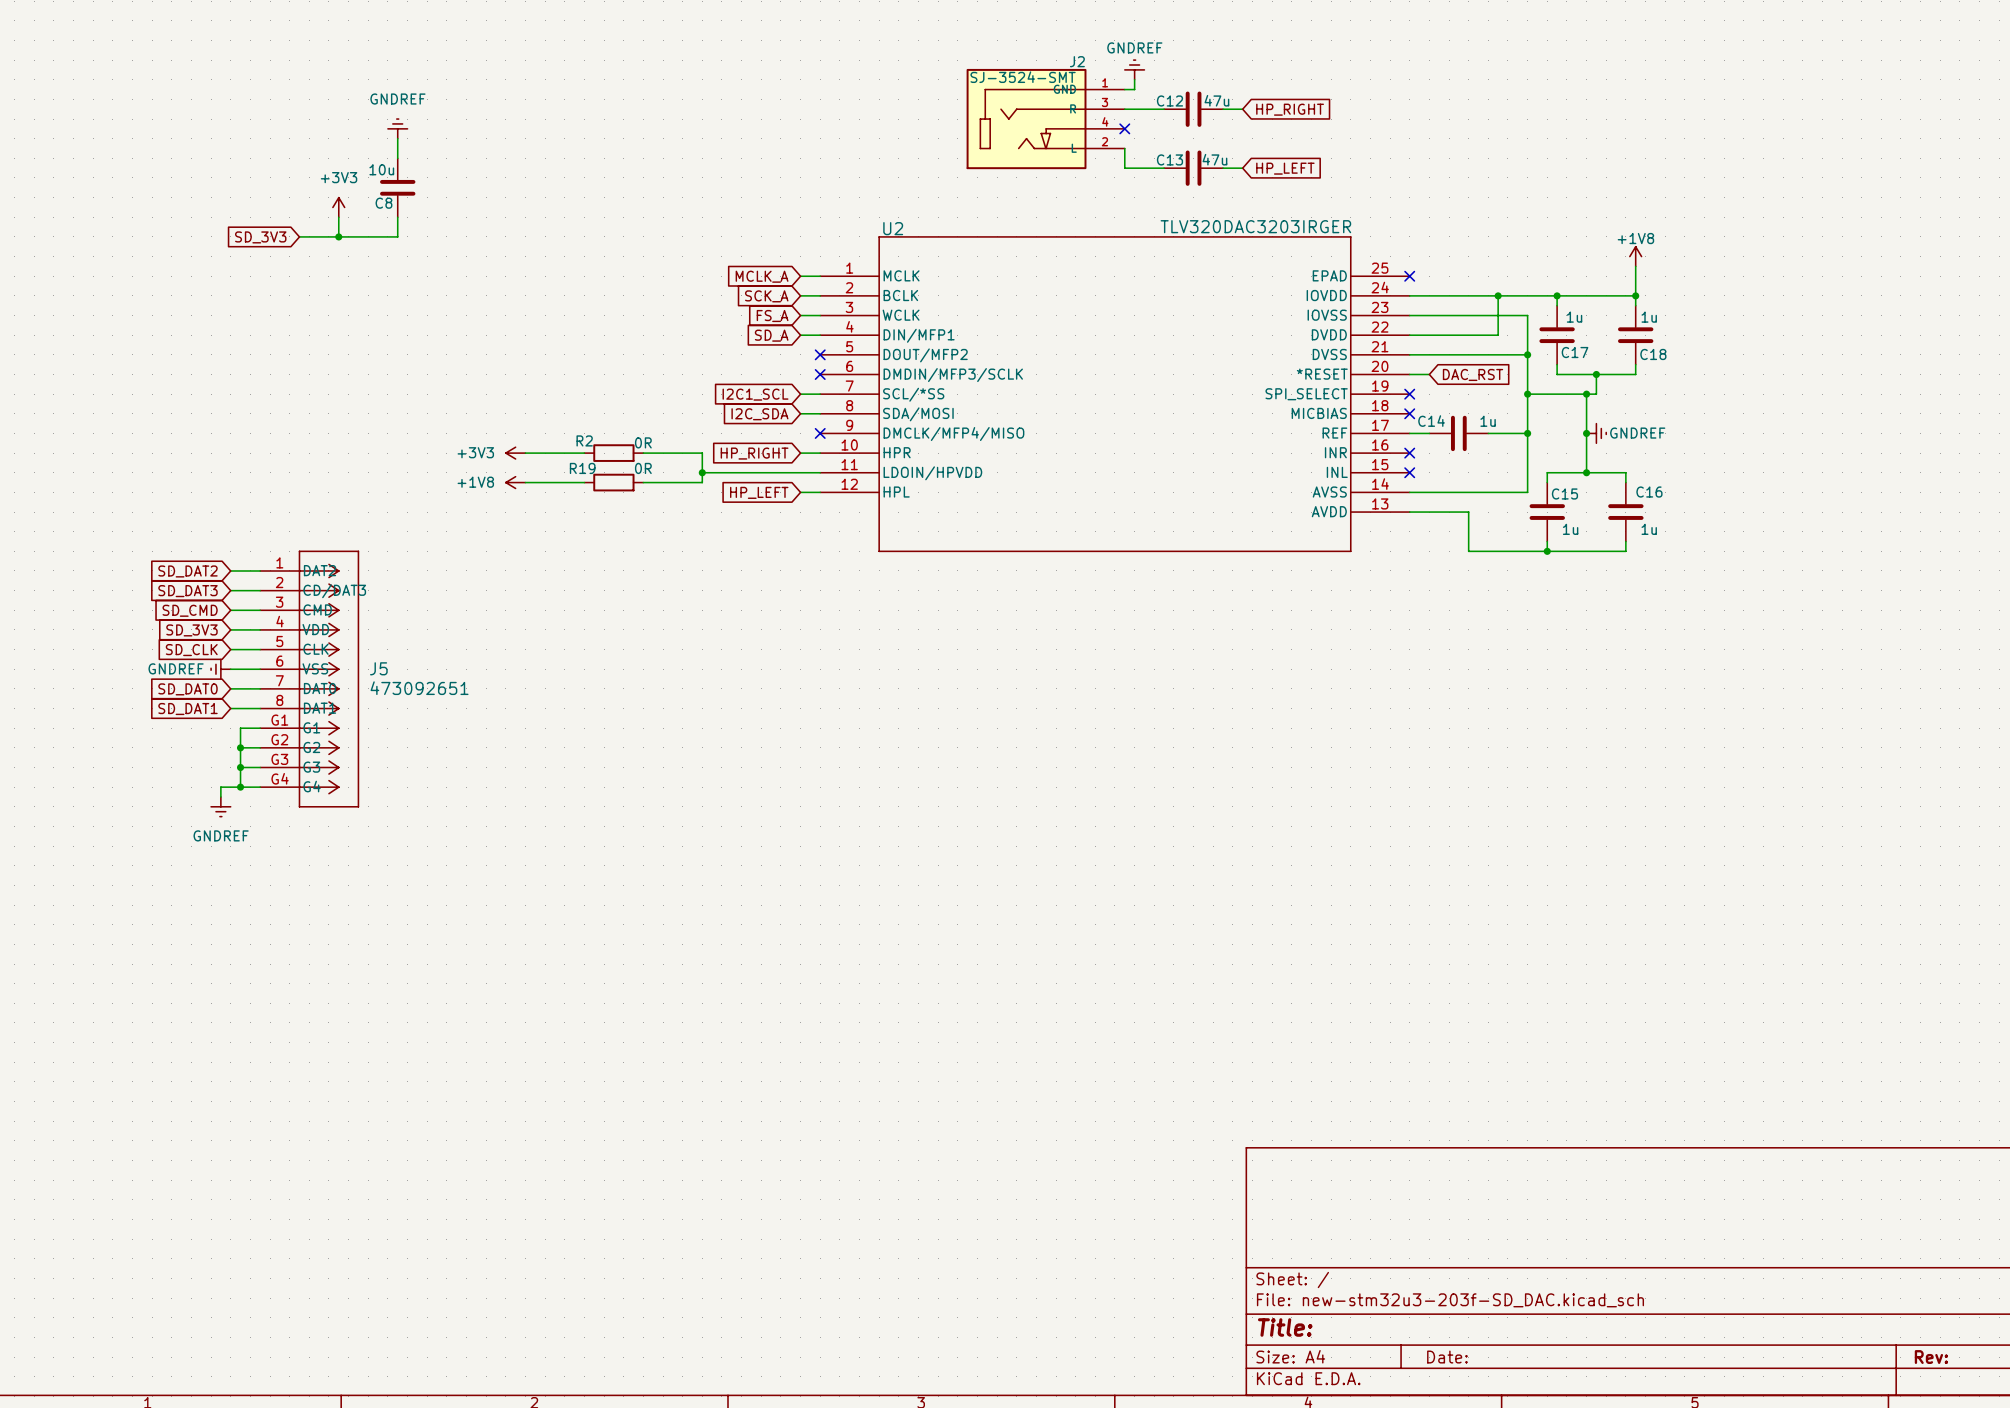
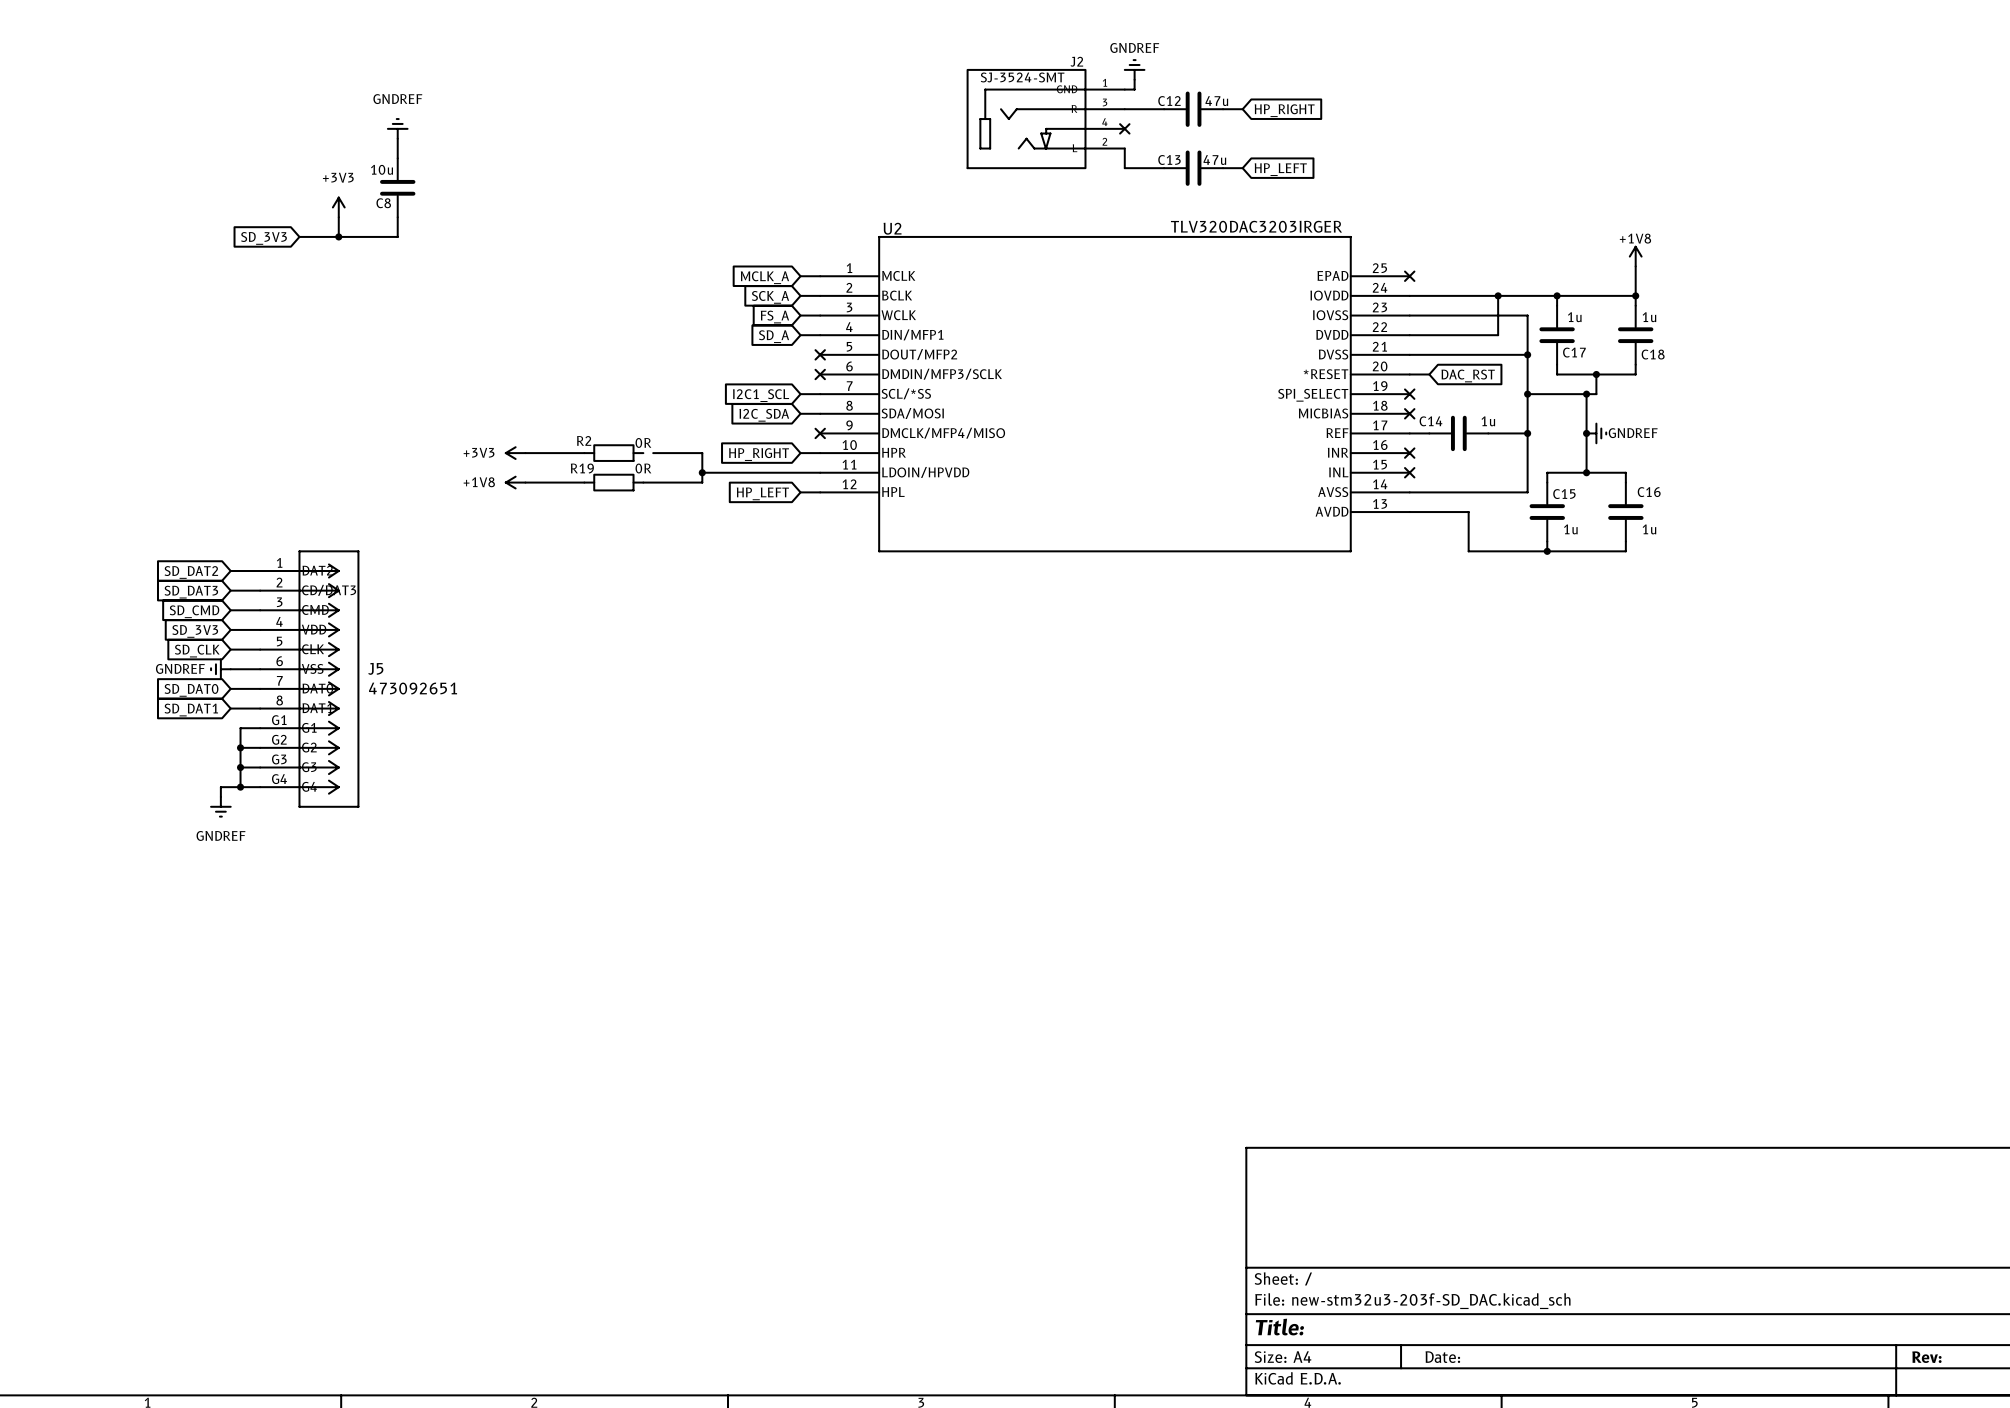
wire: (643, 453) (653, 453) -> none

